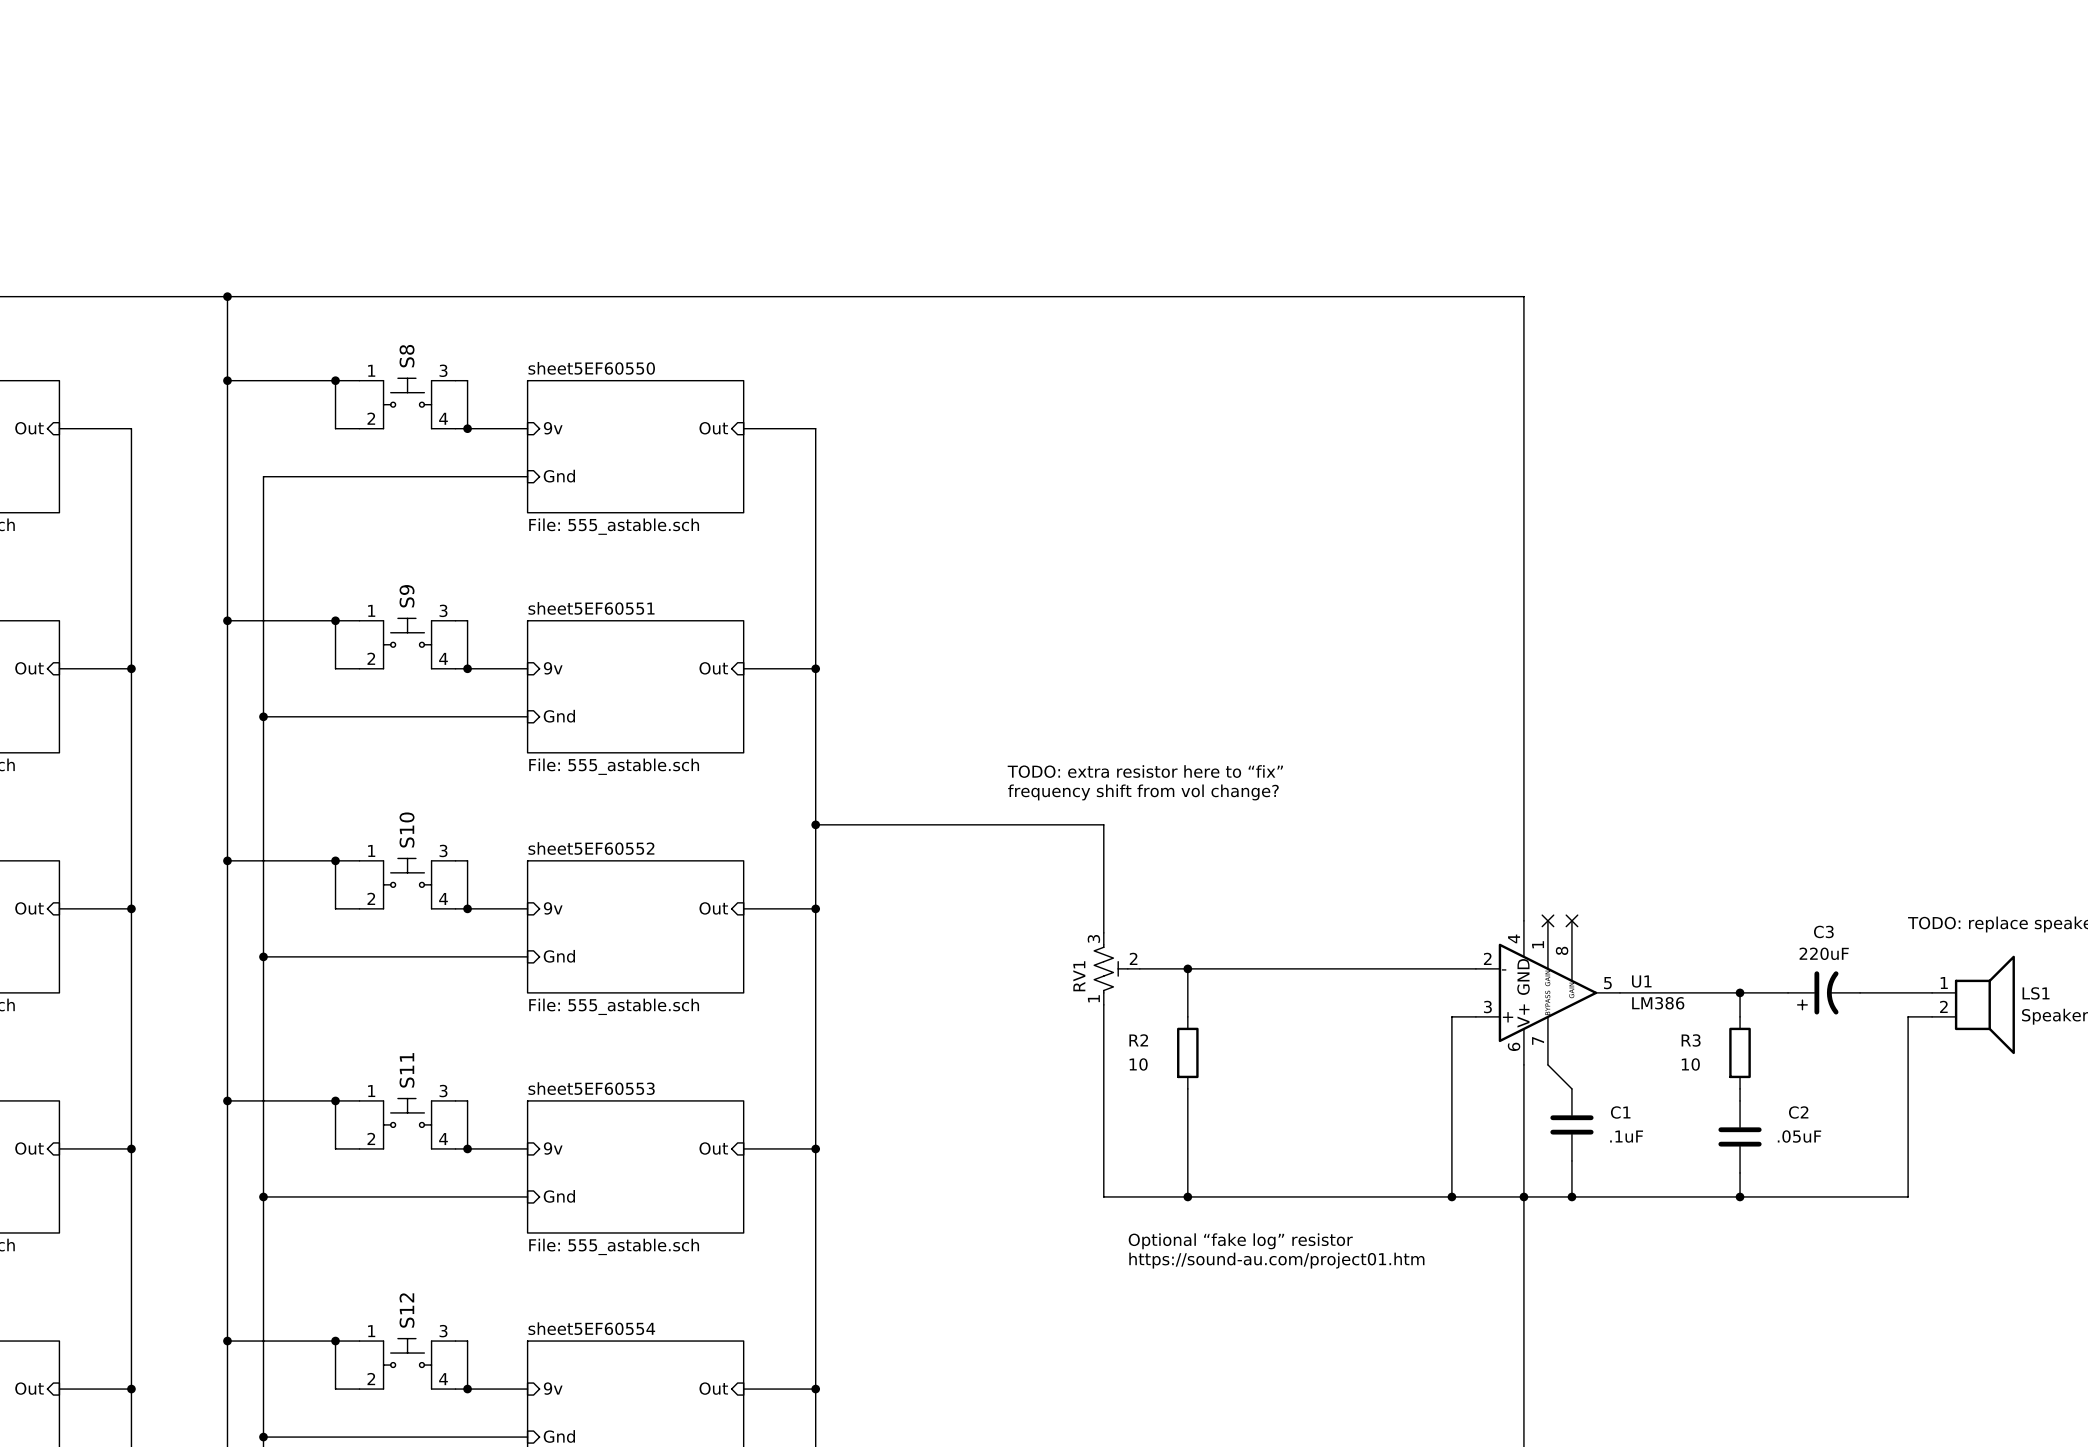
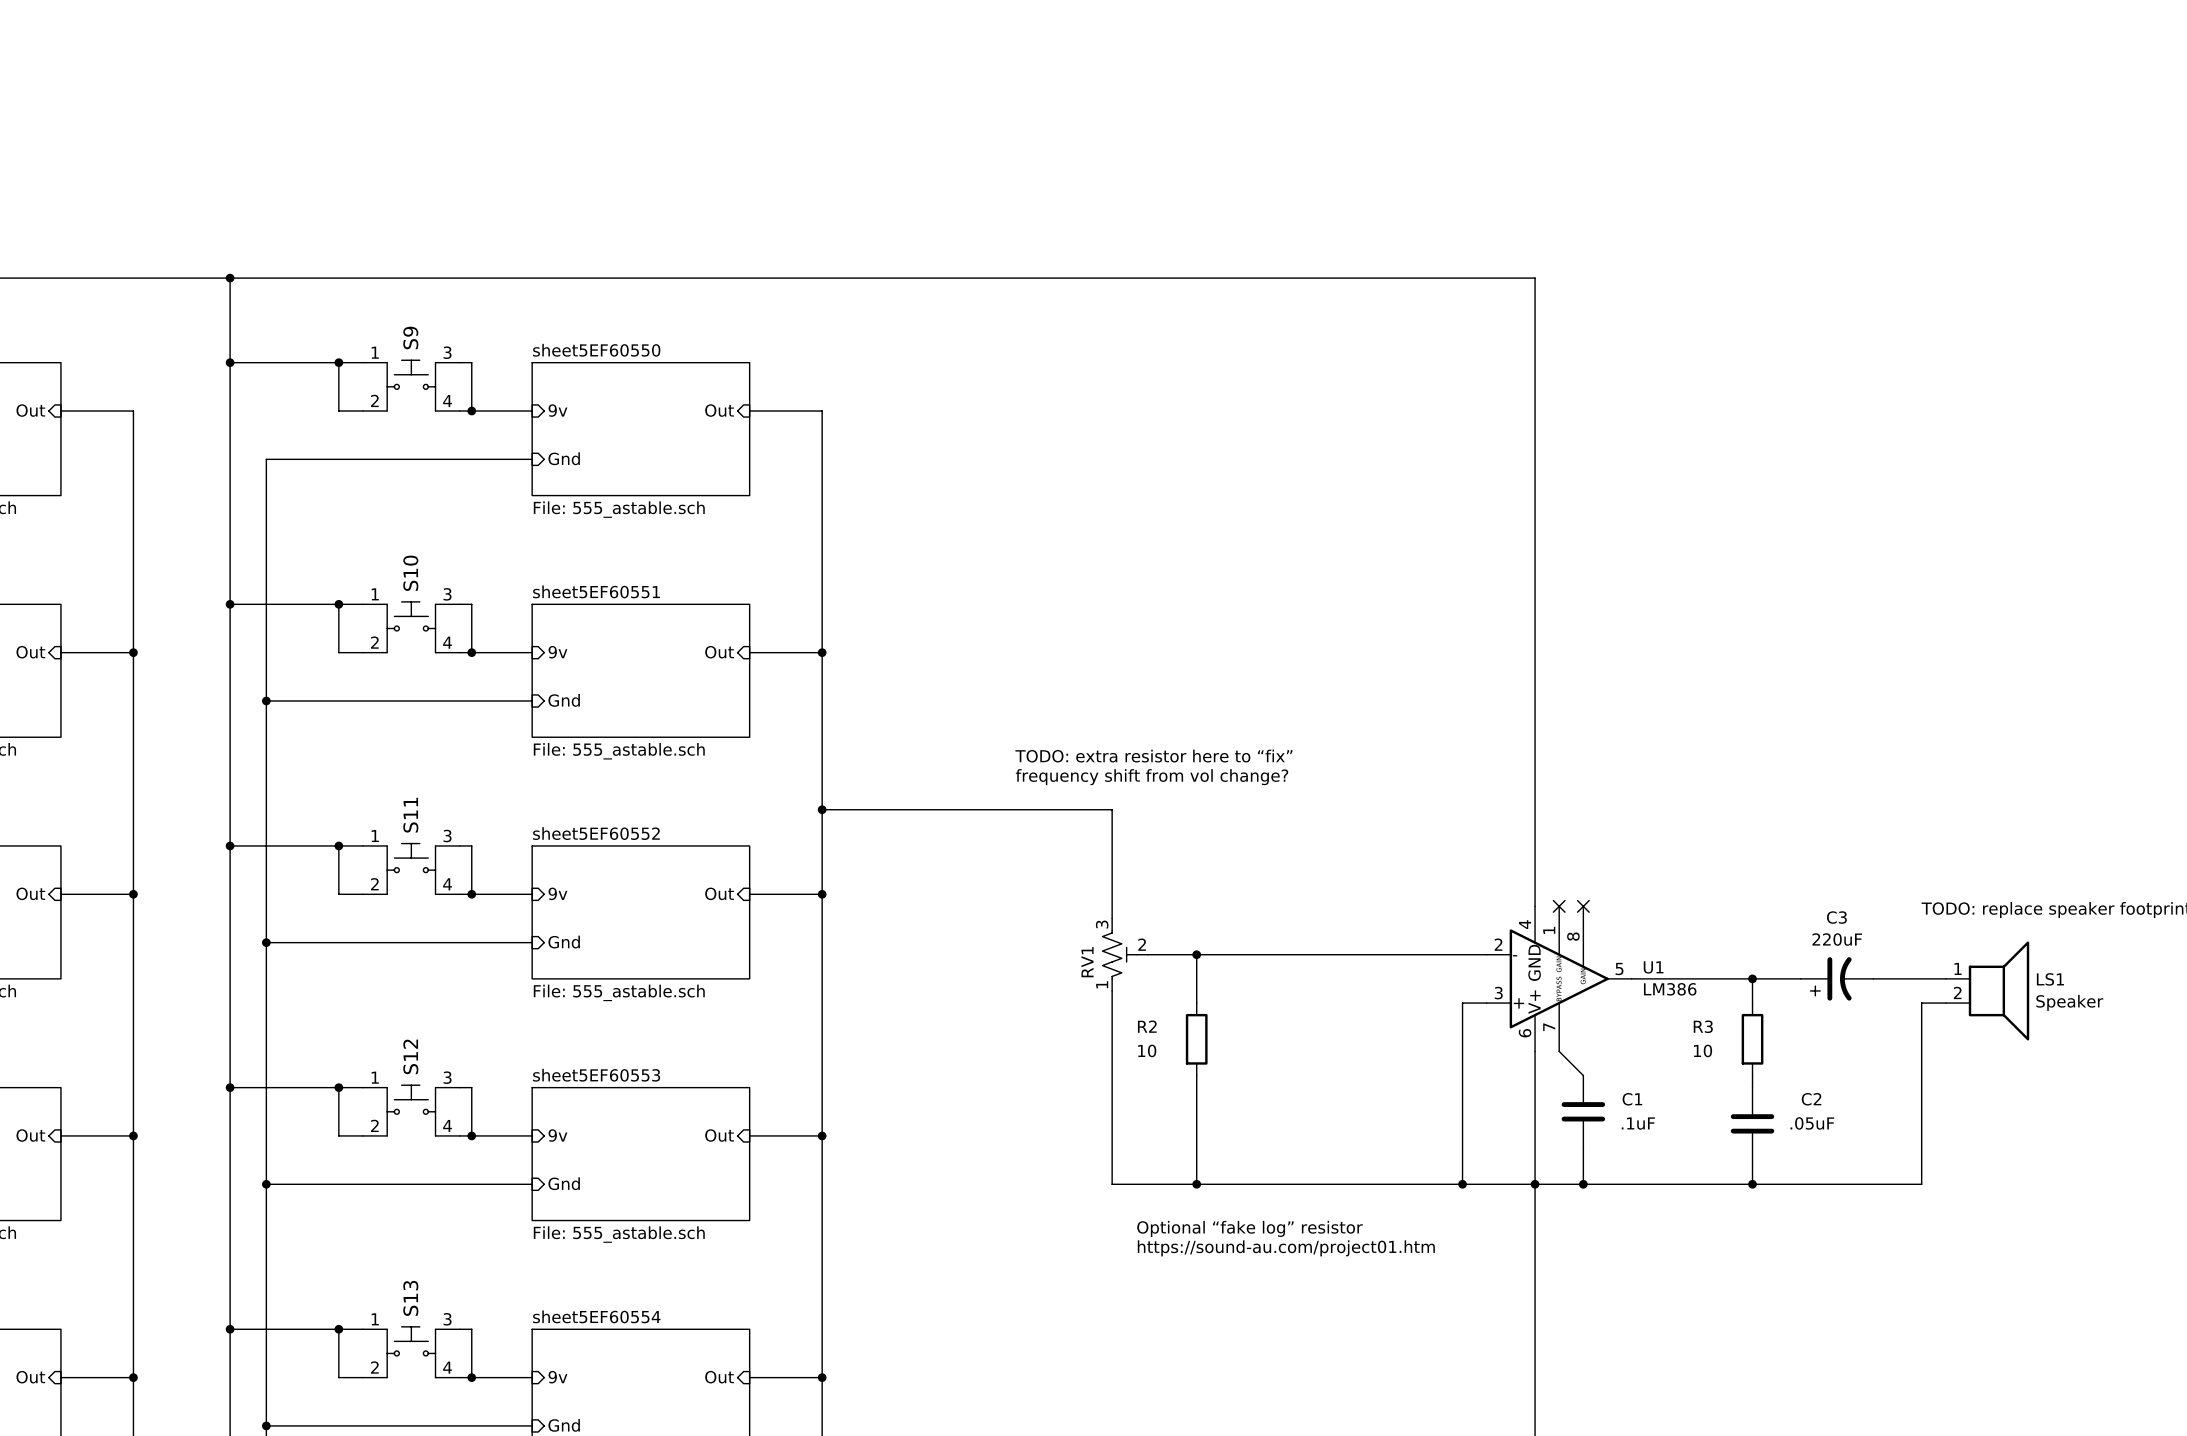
S8 name: S8 (407, 356) -> S9 (410, 337)
S9 name: S9 (407, 596) -> S10 (410, 573)
S10 name: S10 (407, 830) -> S11 (410, 815)
S11 name: S11 (407, 1070) -> S12 (410, 1056)
S12 name: S12 (407, 1310) -> S13 (410, 1298)

